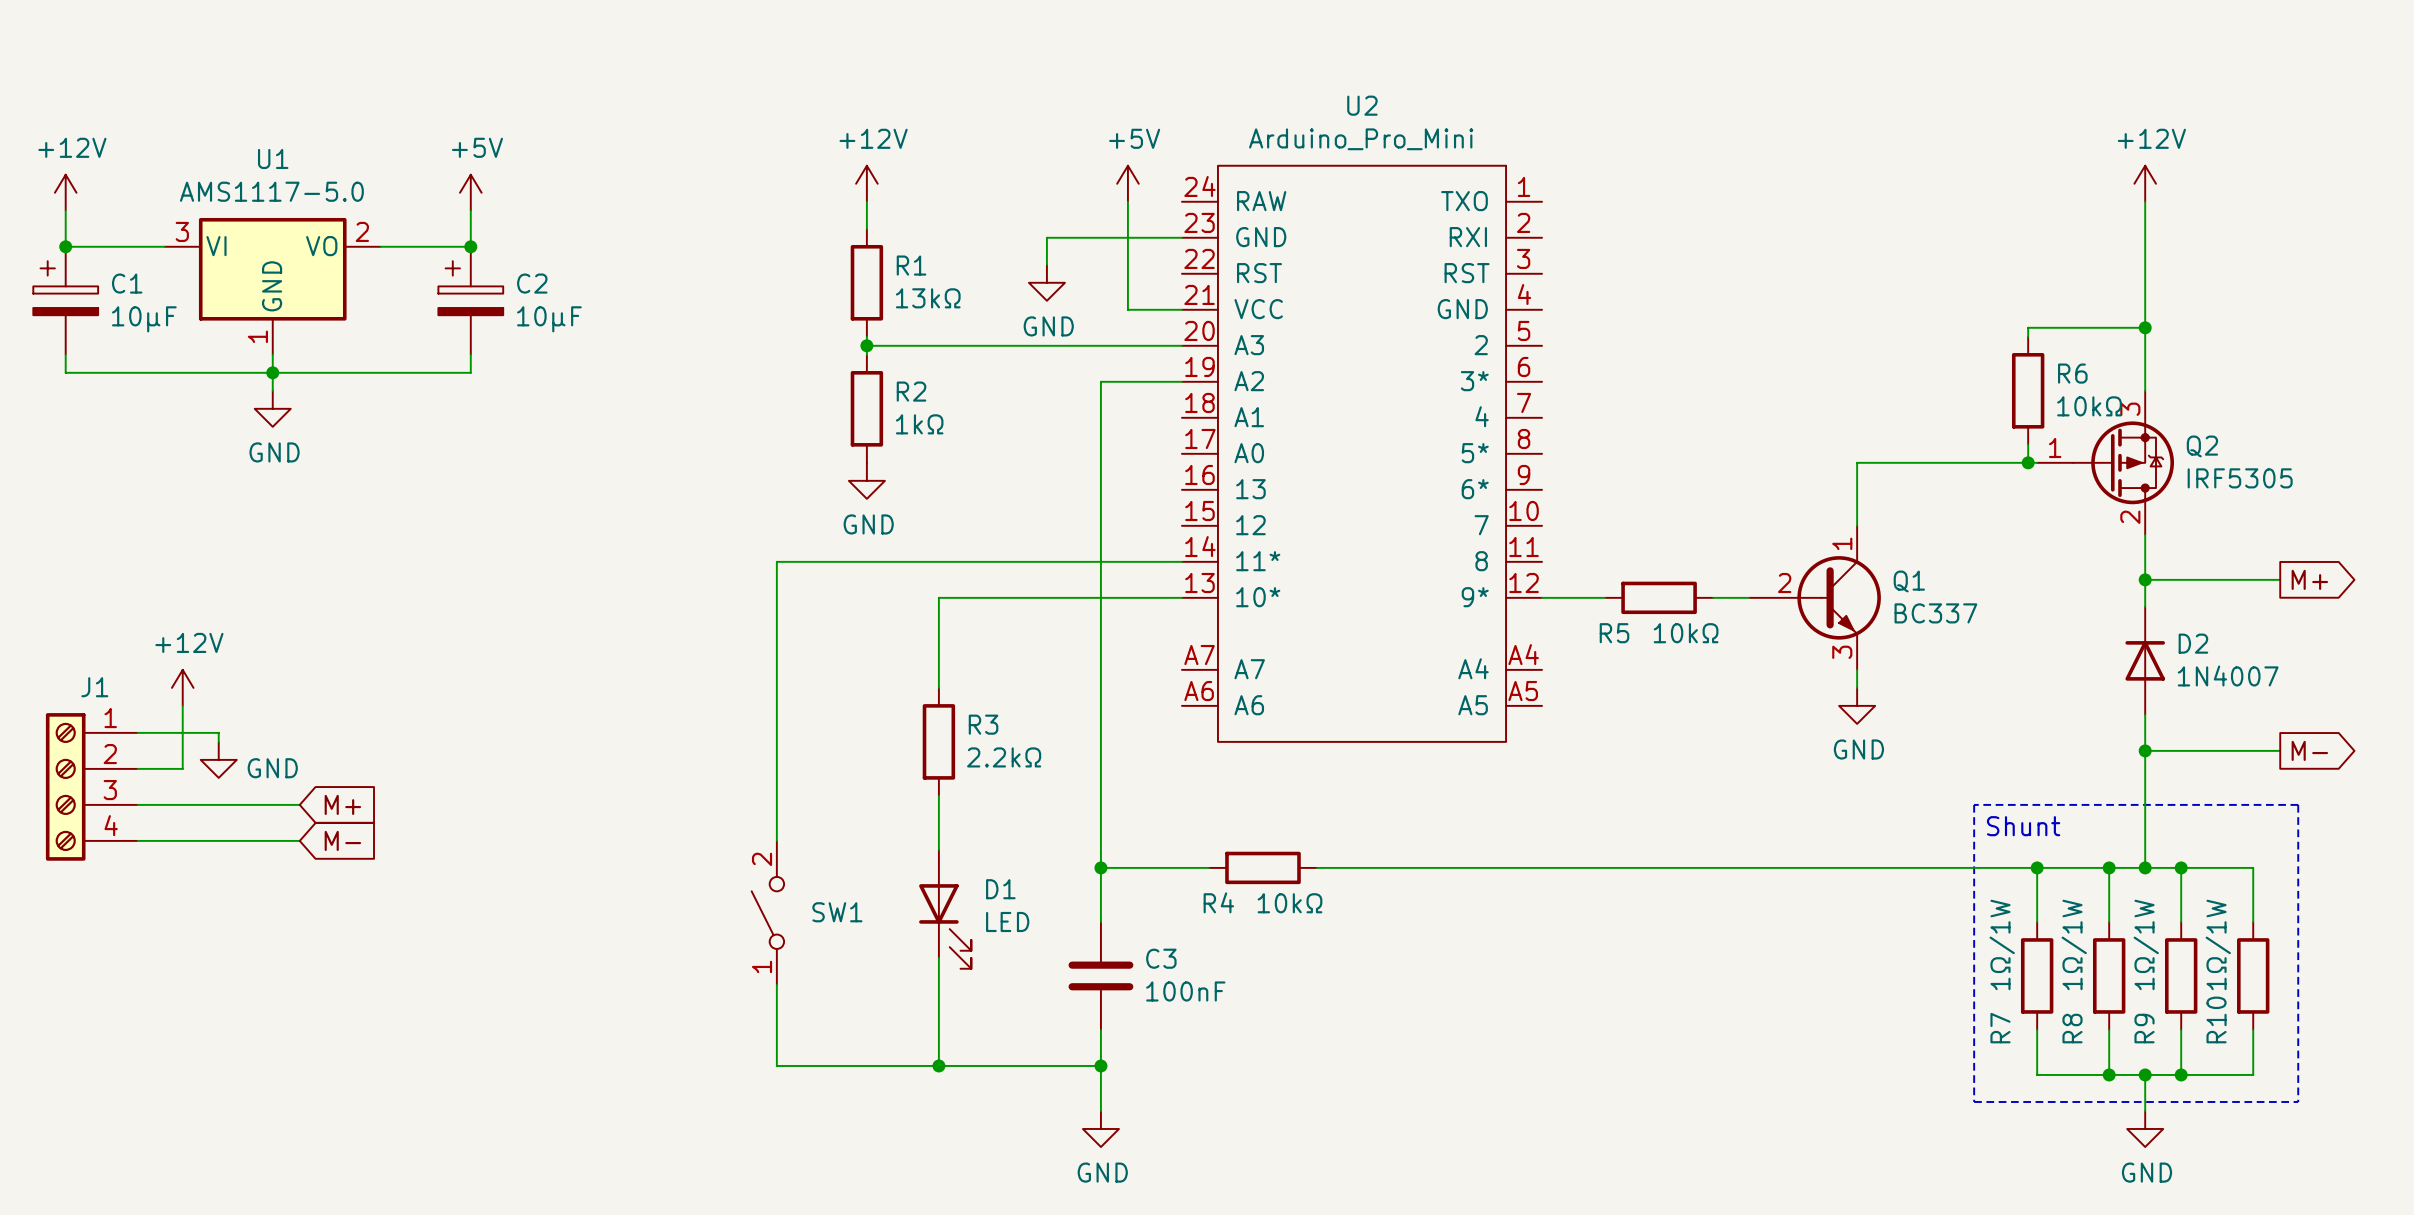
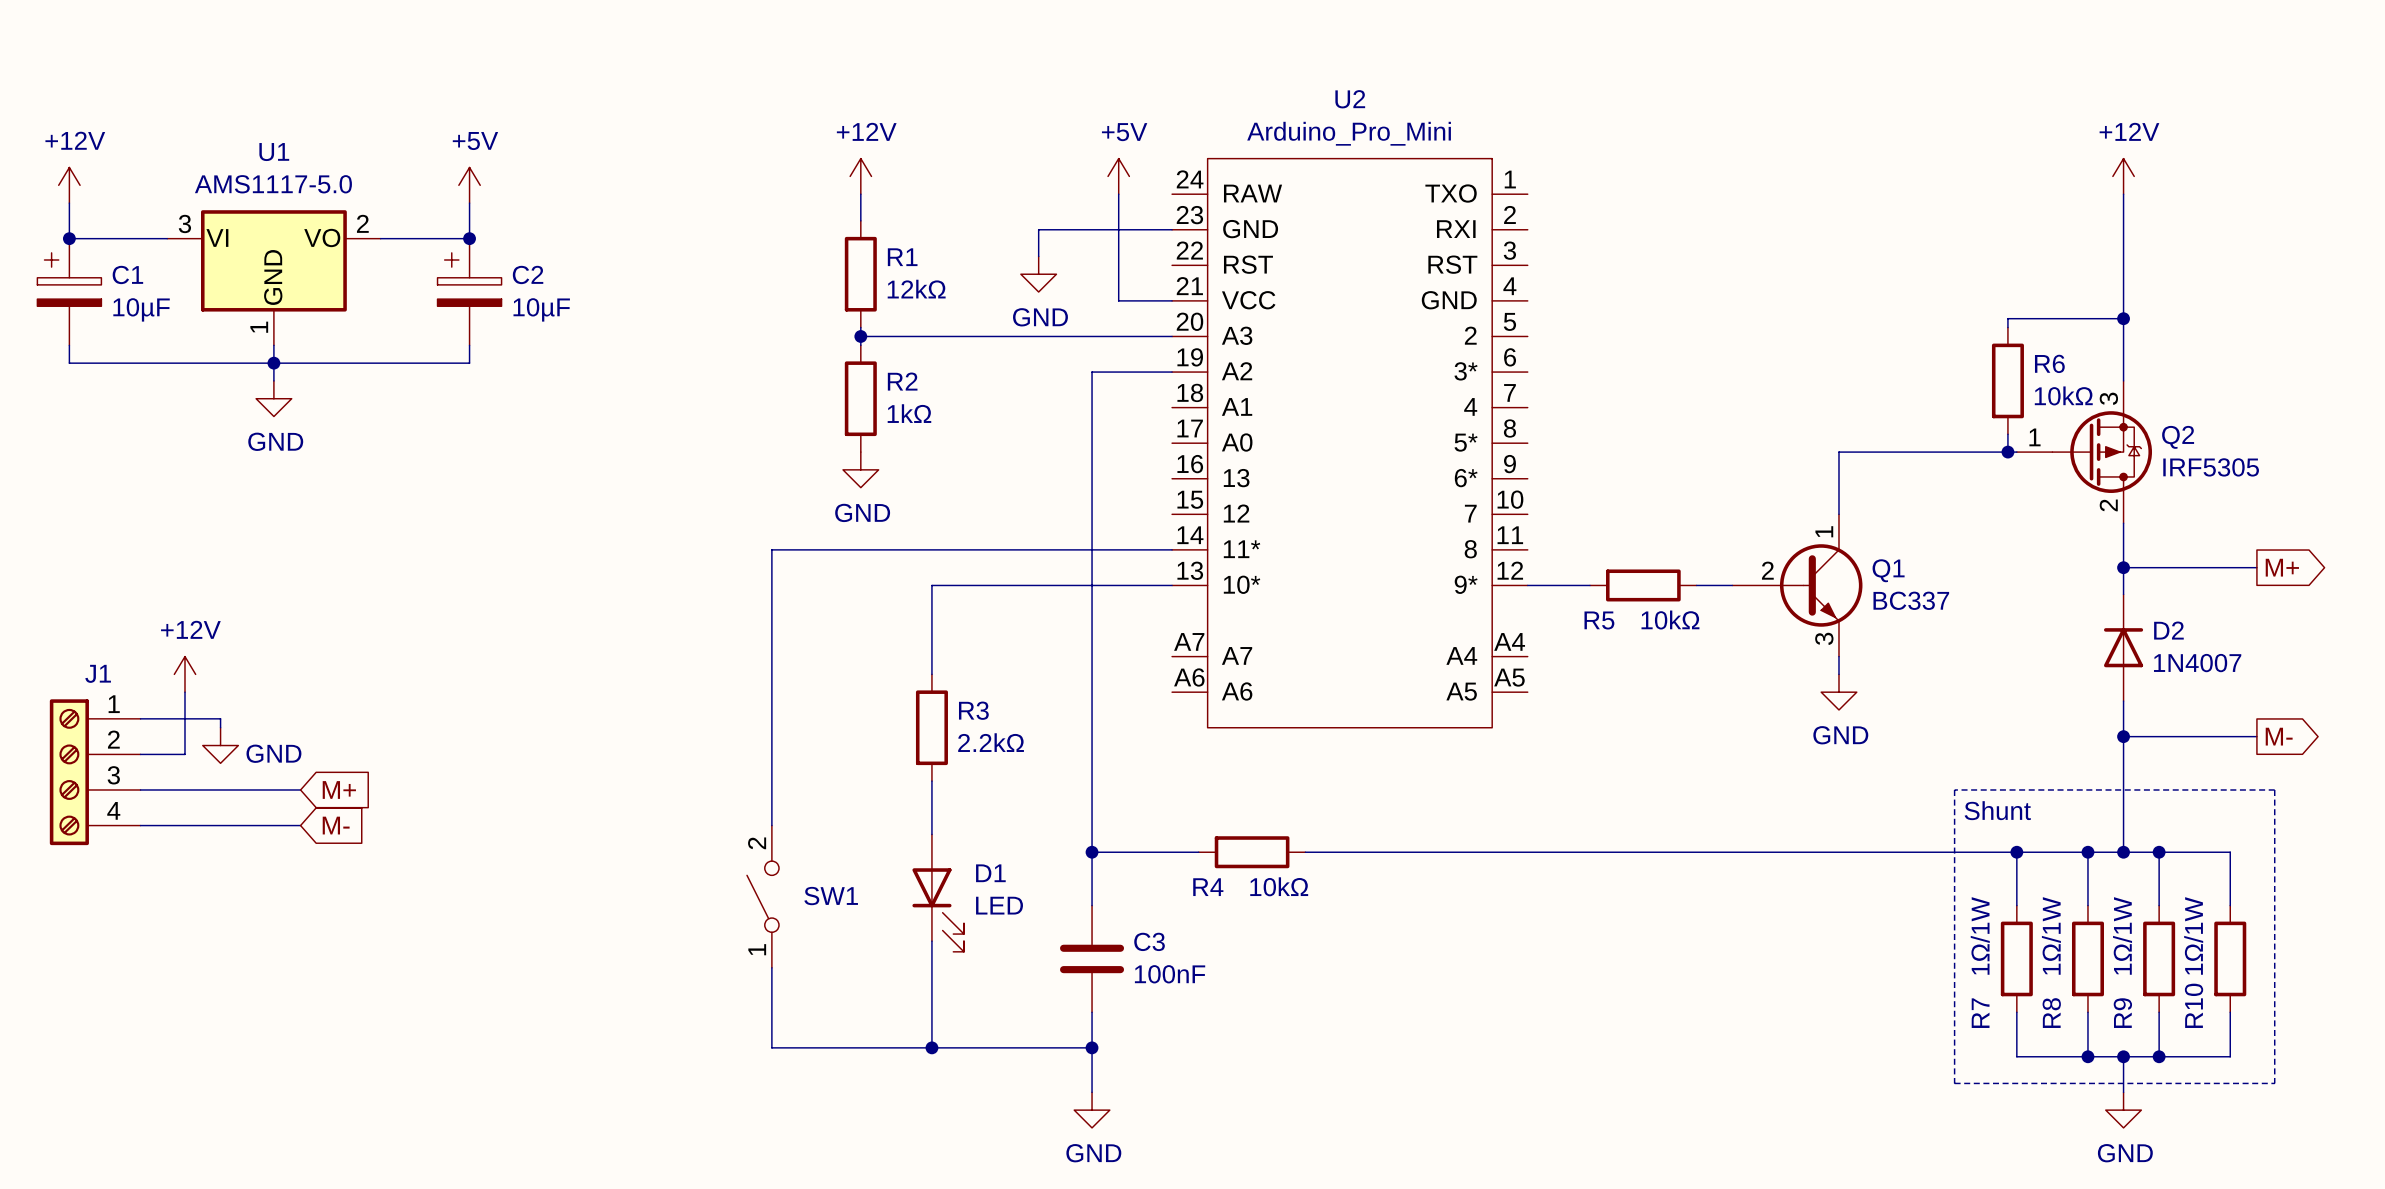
R1 value: 13kΩ (928, 298) -> 12kΩ (916, 289)

